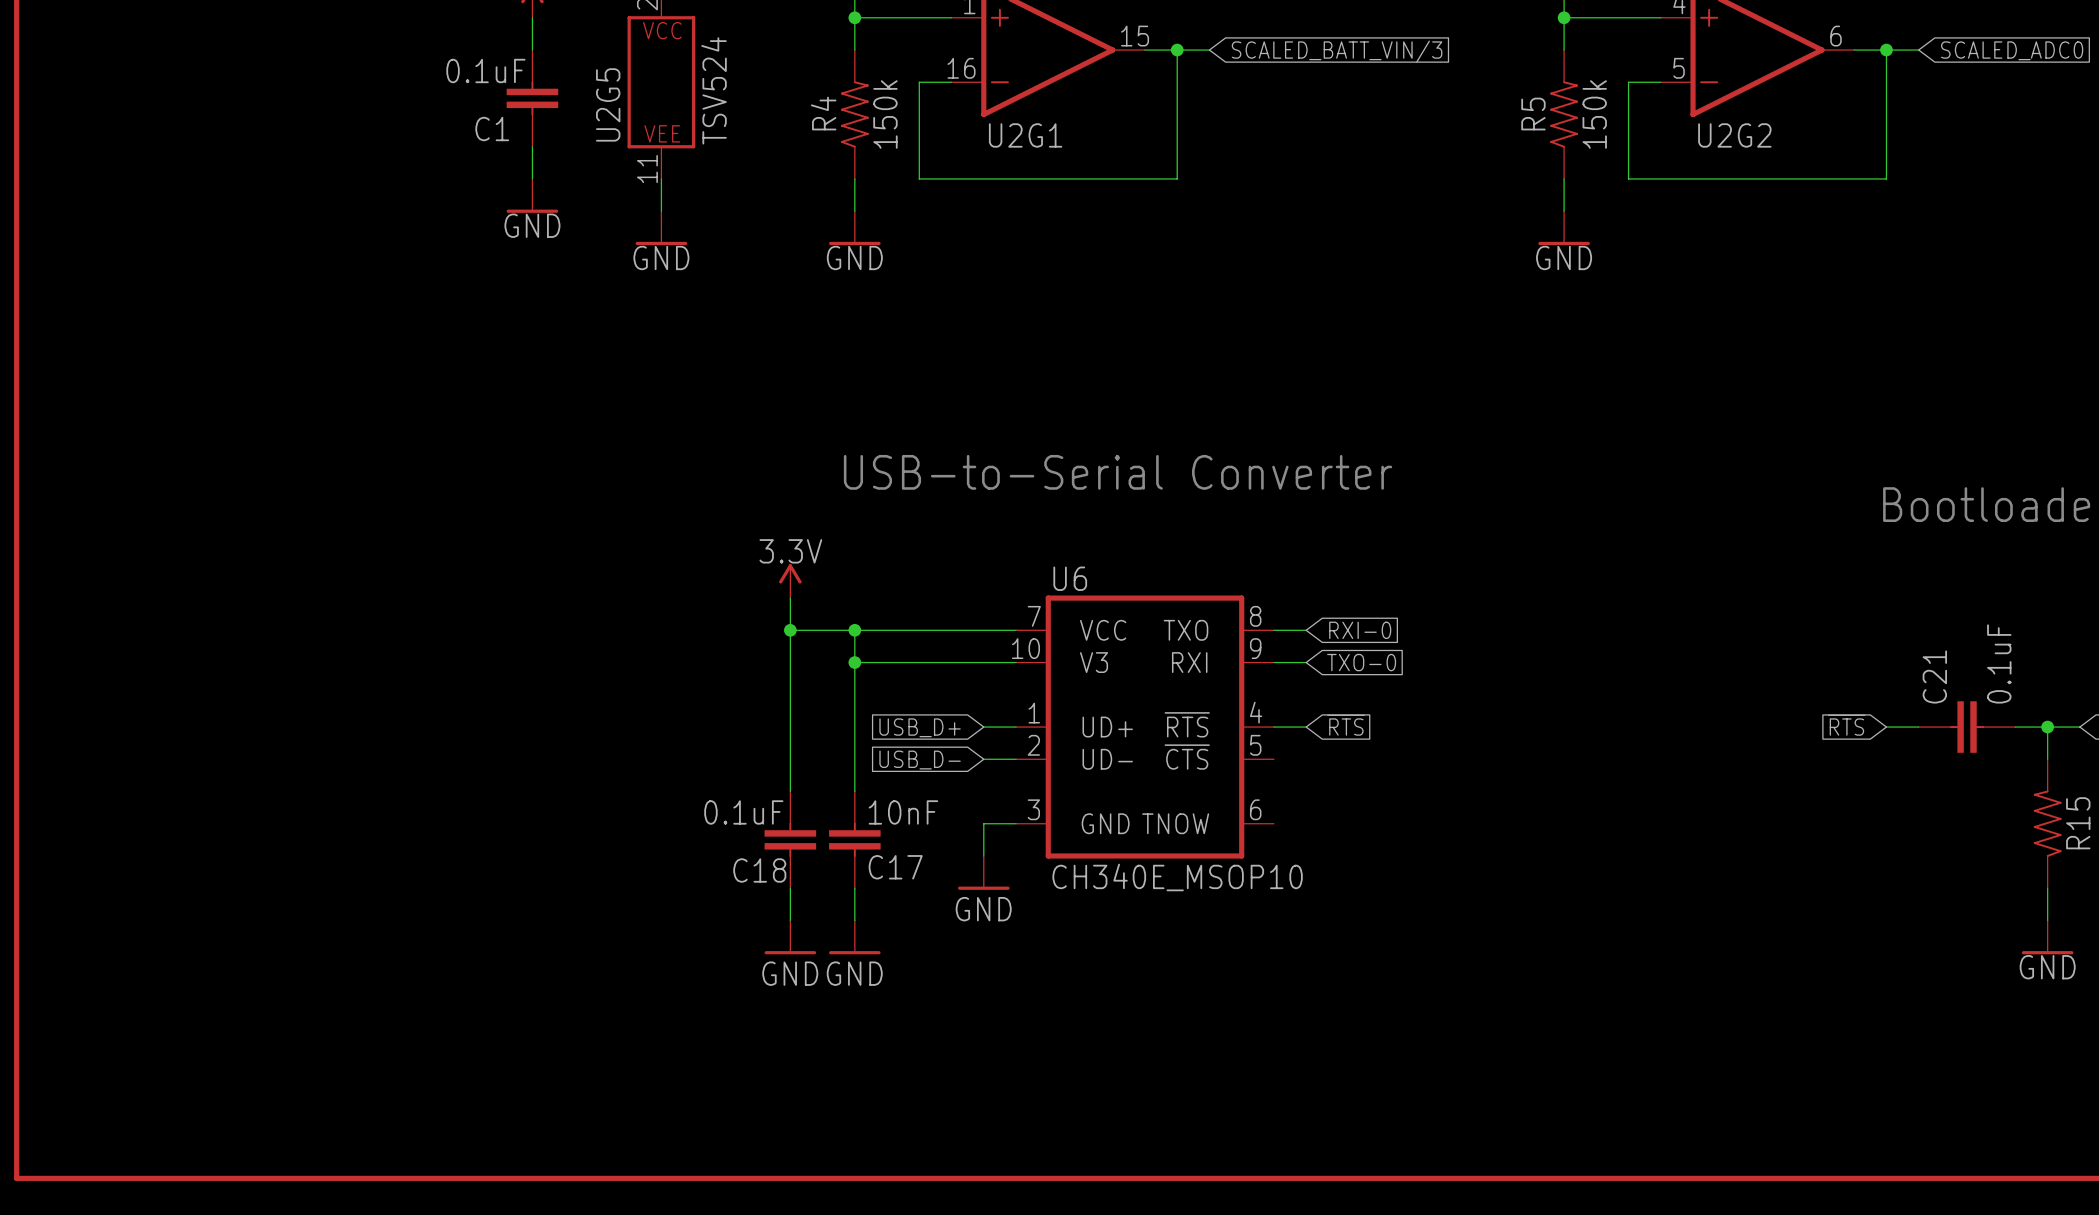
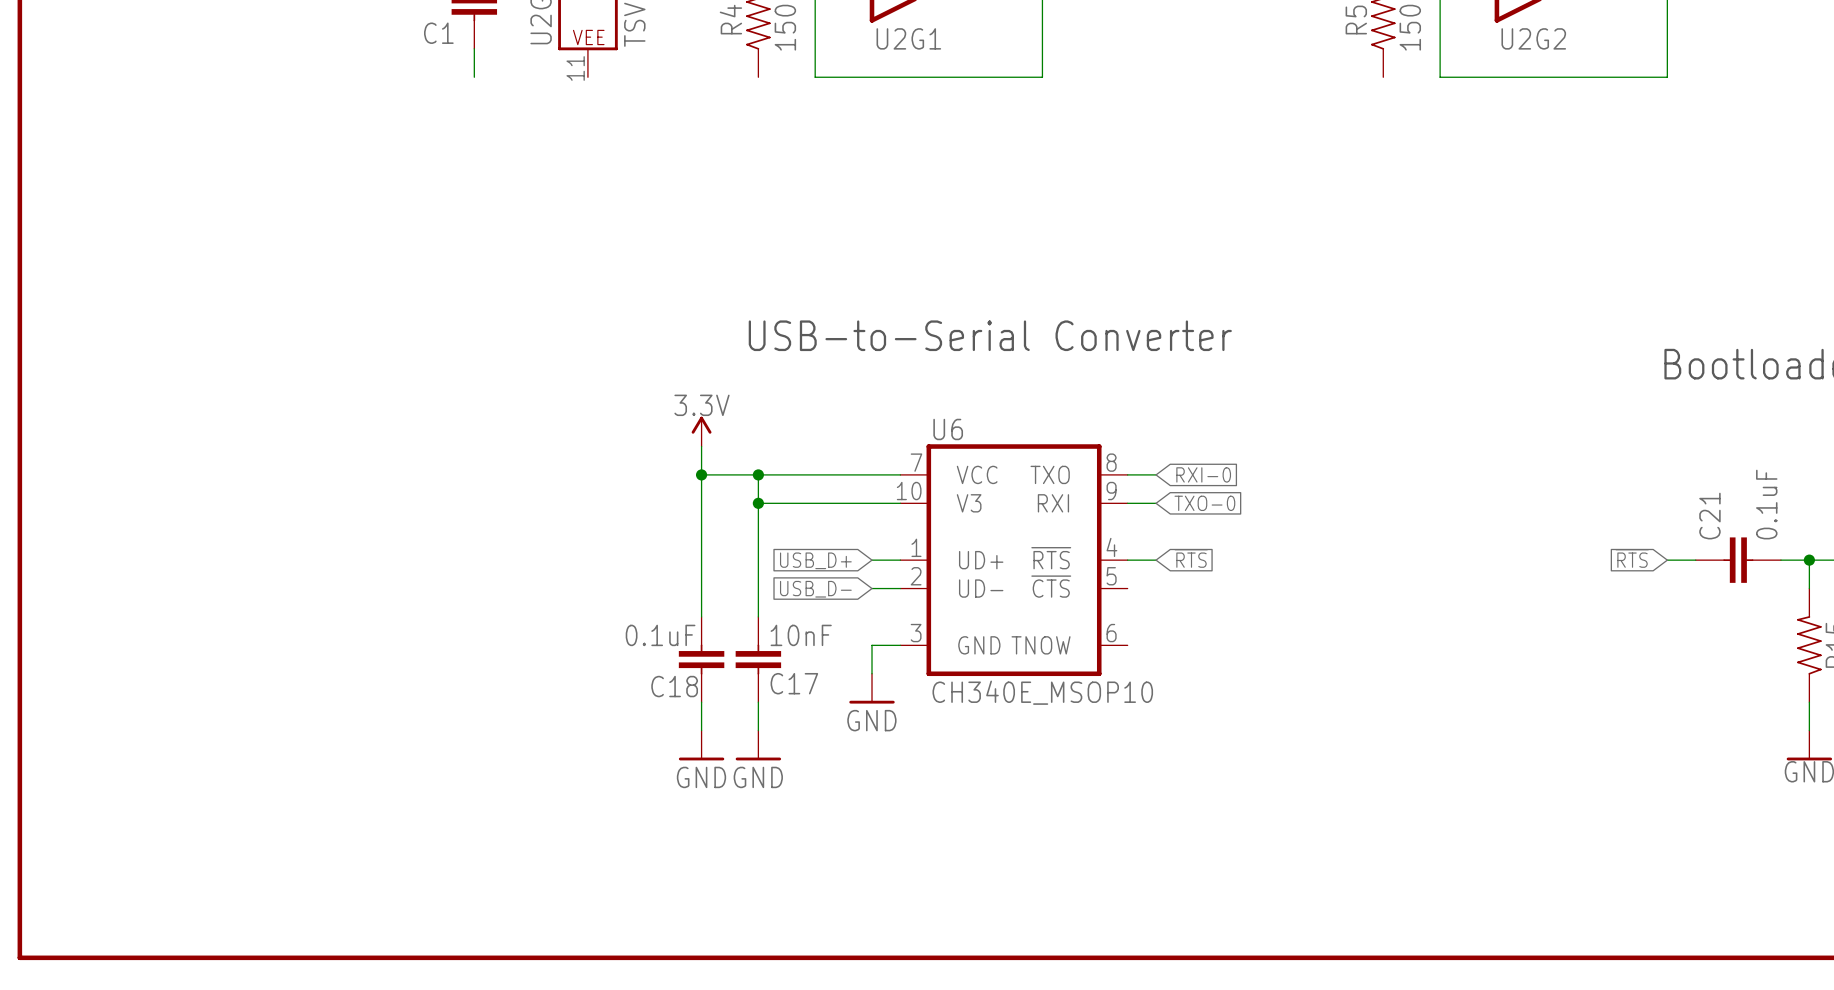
wire: (661, 178) (661, 211) -> none
wire: (854, 178) (854, 211) -> none
wire: (1564, 178) (1564, 211) -> none
power symbol: GND (532, 195) -> none
power symbol: GND (661, 228) -> none
power symbol: GND (854, 228) -> none
power symbol: GND (1564, 228) -> none

